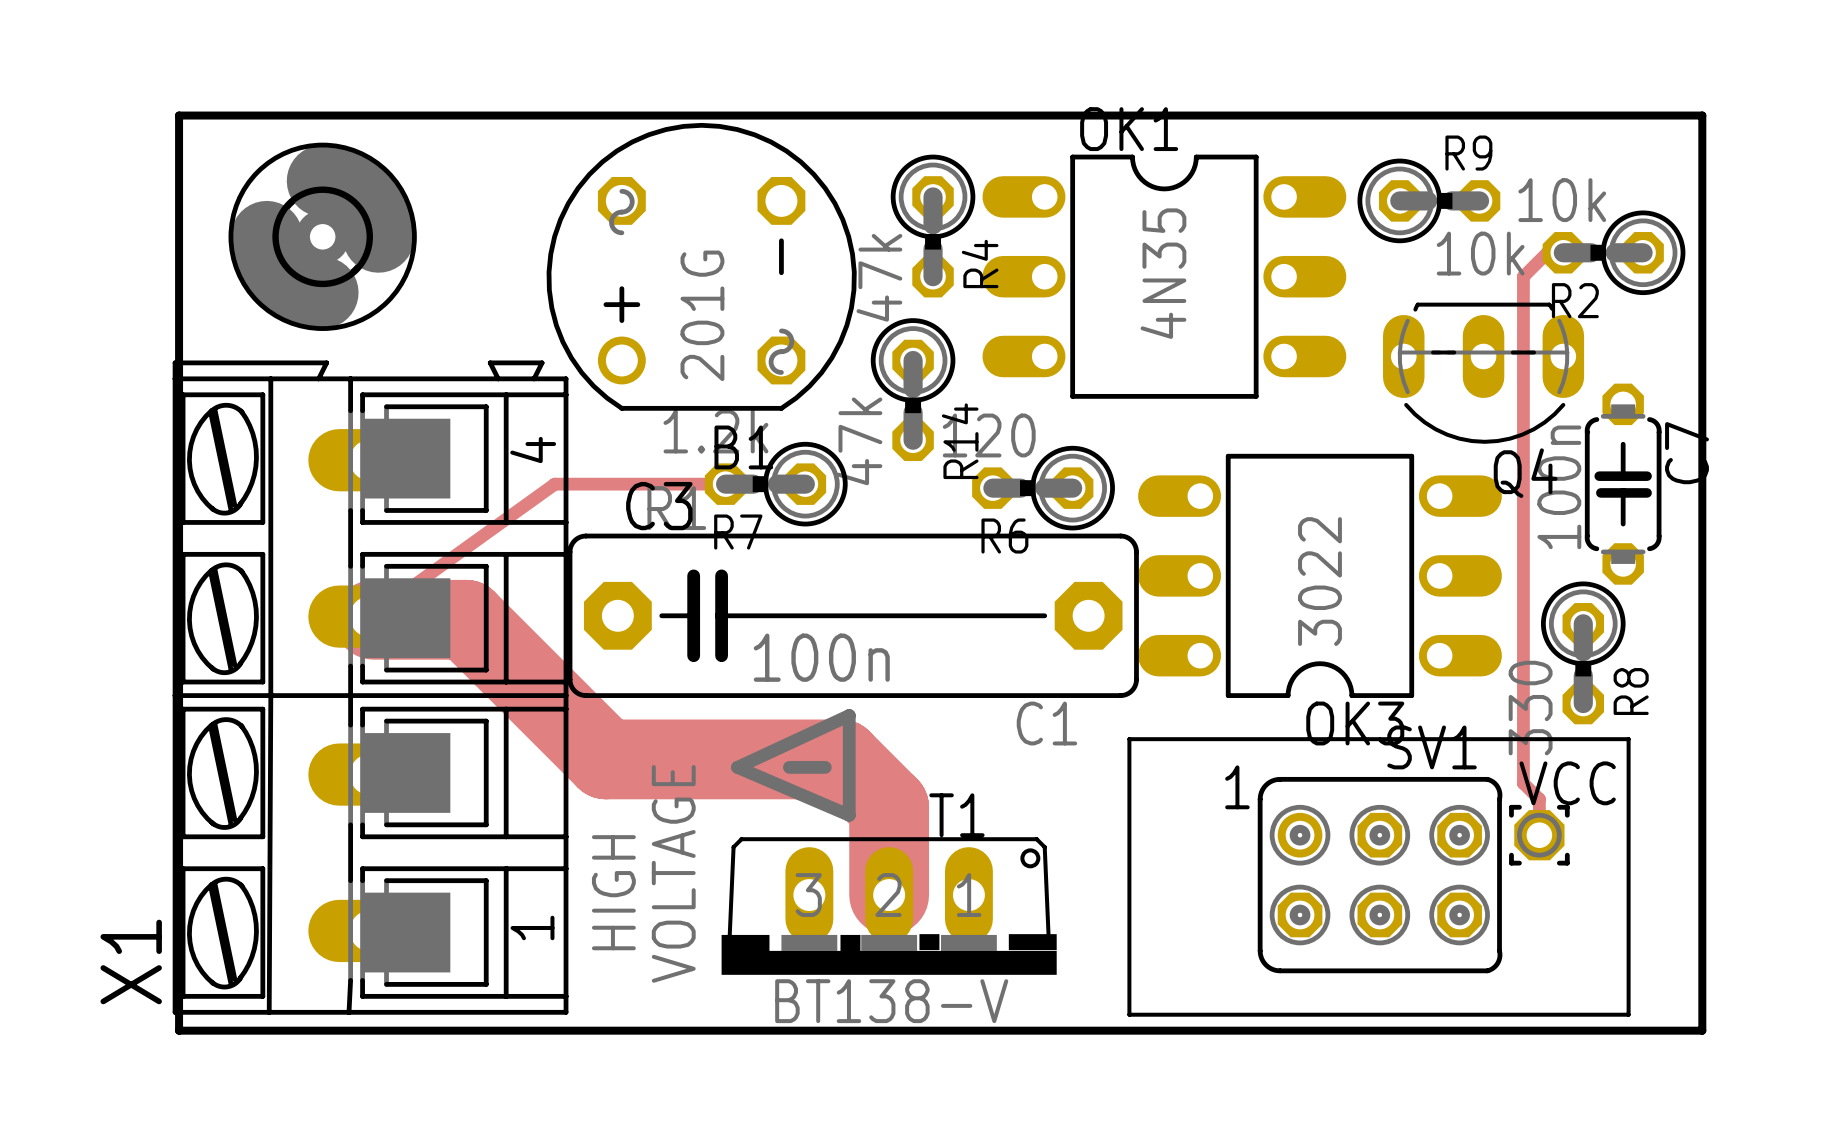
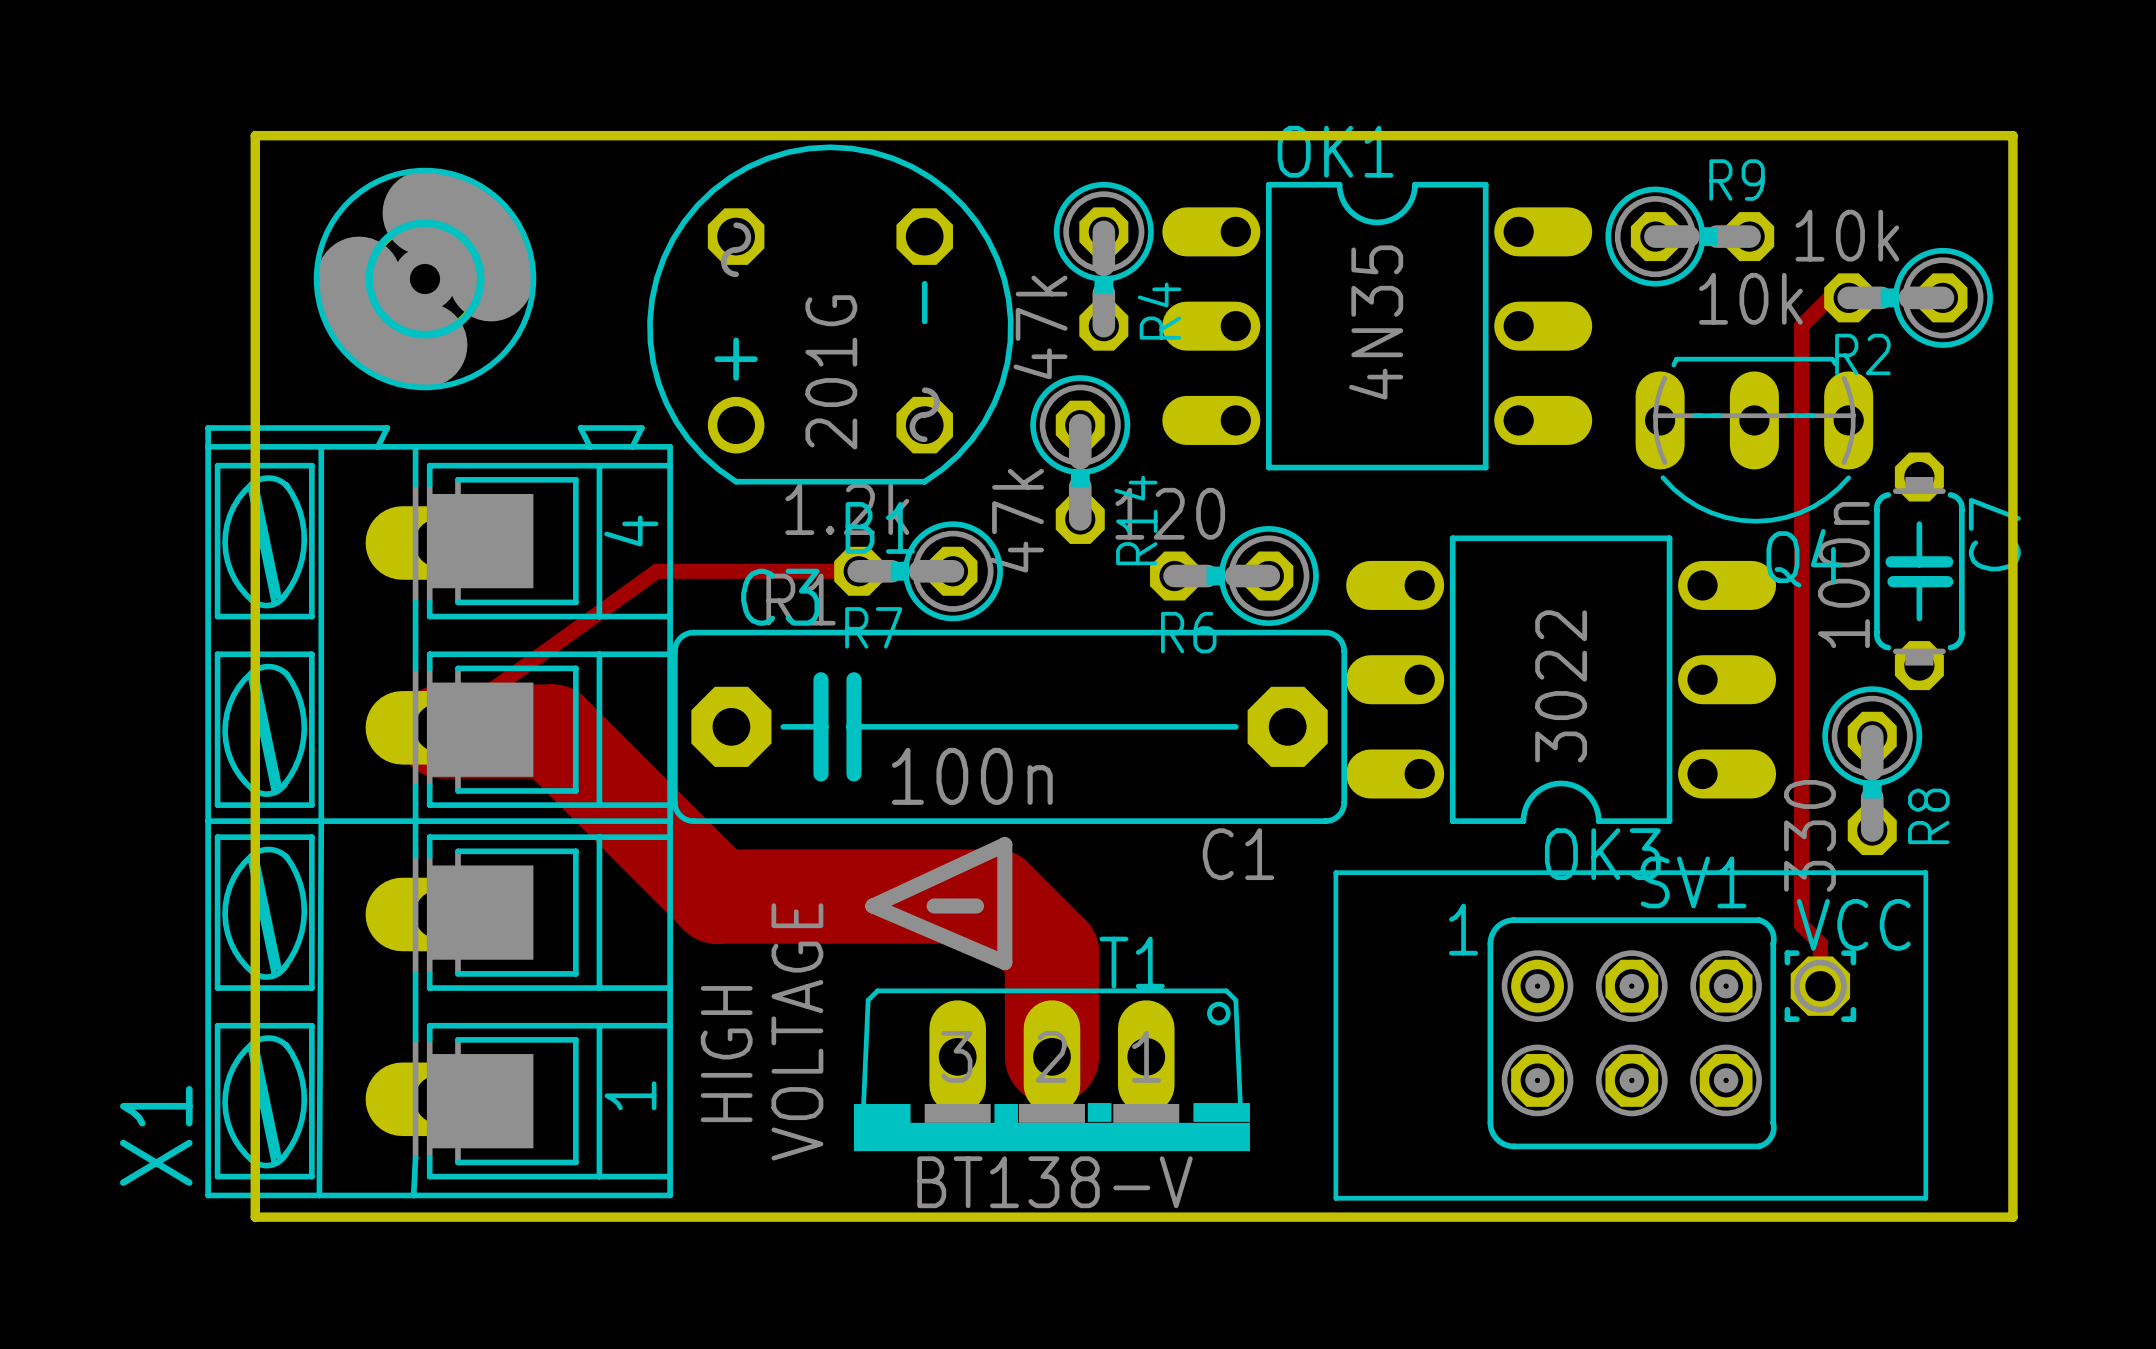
board edge: (214, 115) (179, 115) (179, 1030) (214, 1030) -> (255, 135) (255, 1217)
part position: (322, 236) -> (424, 279)

